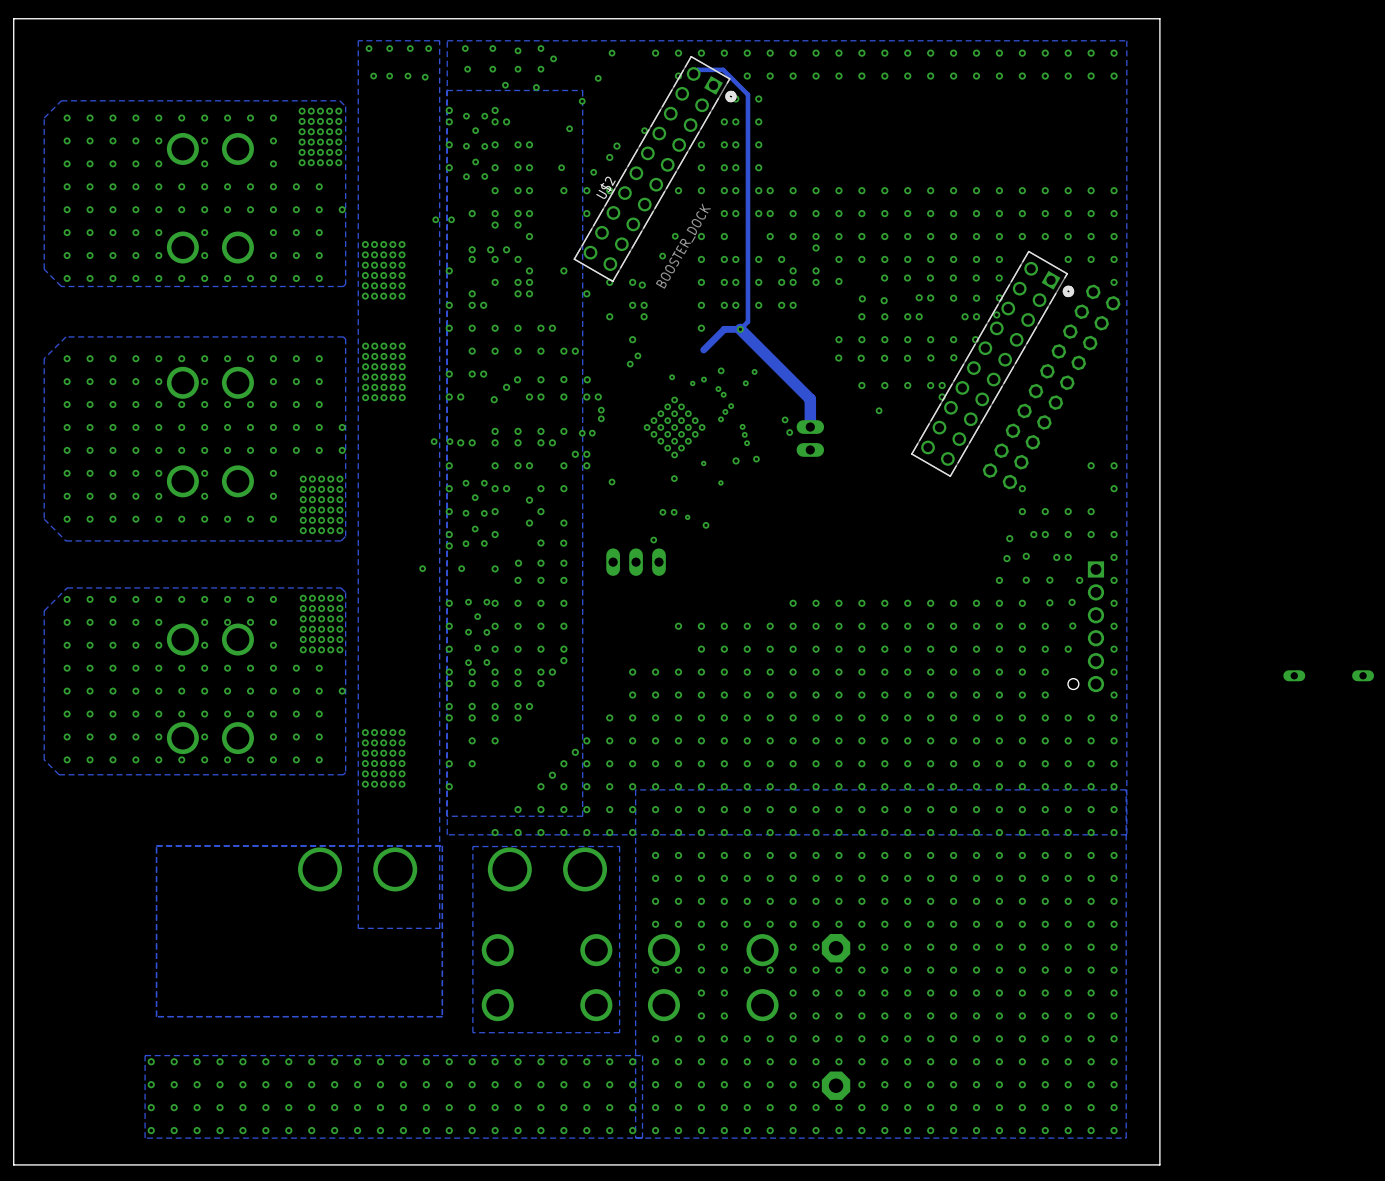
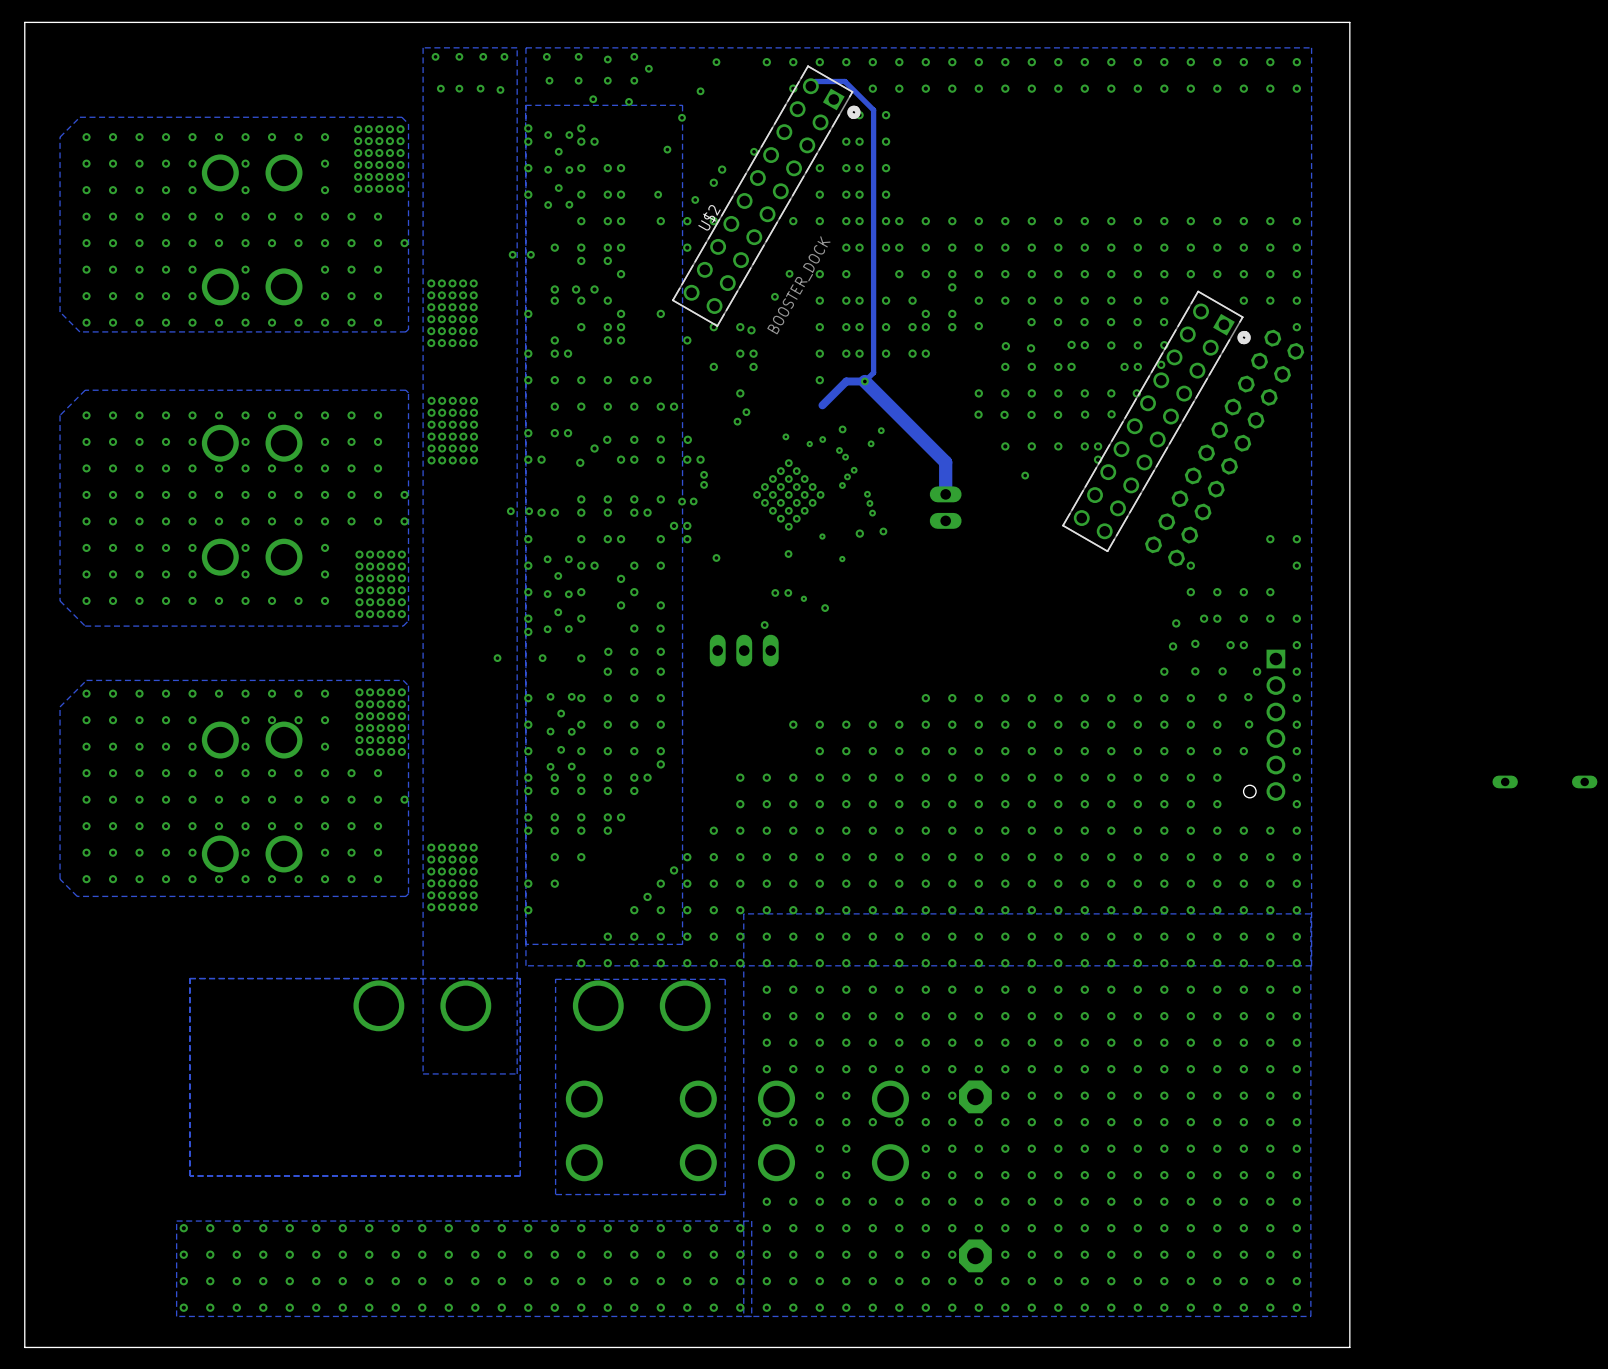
via: (785, 419) -> none
via: (789, 432) -> none

